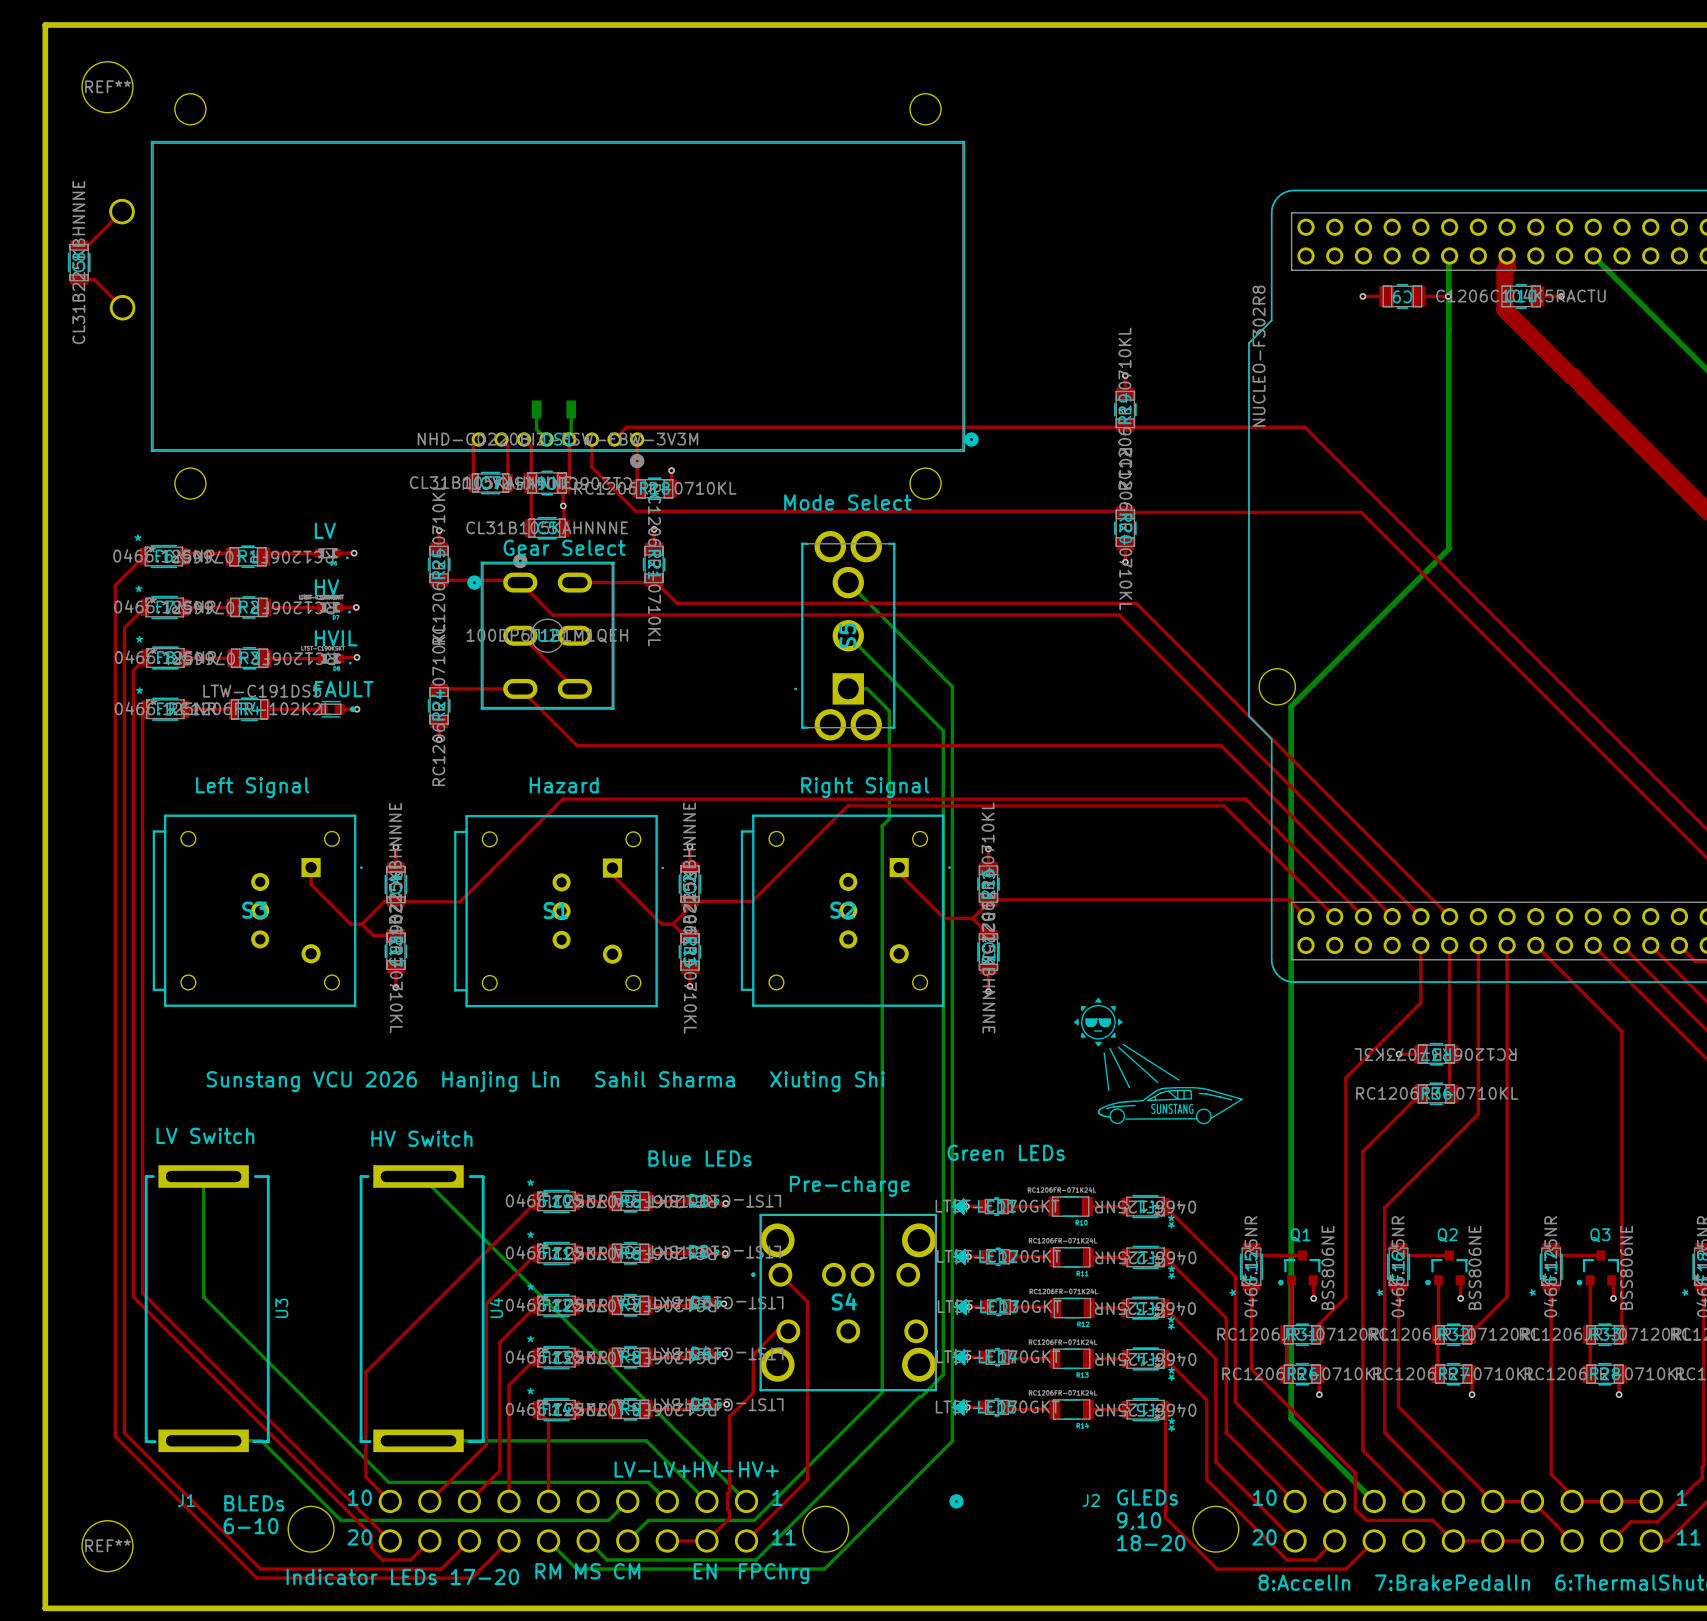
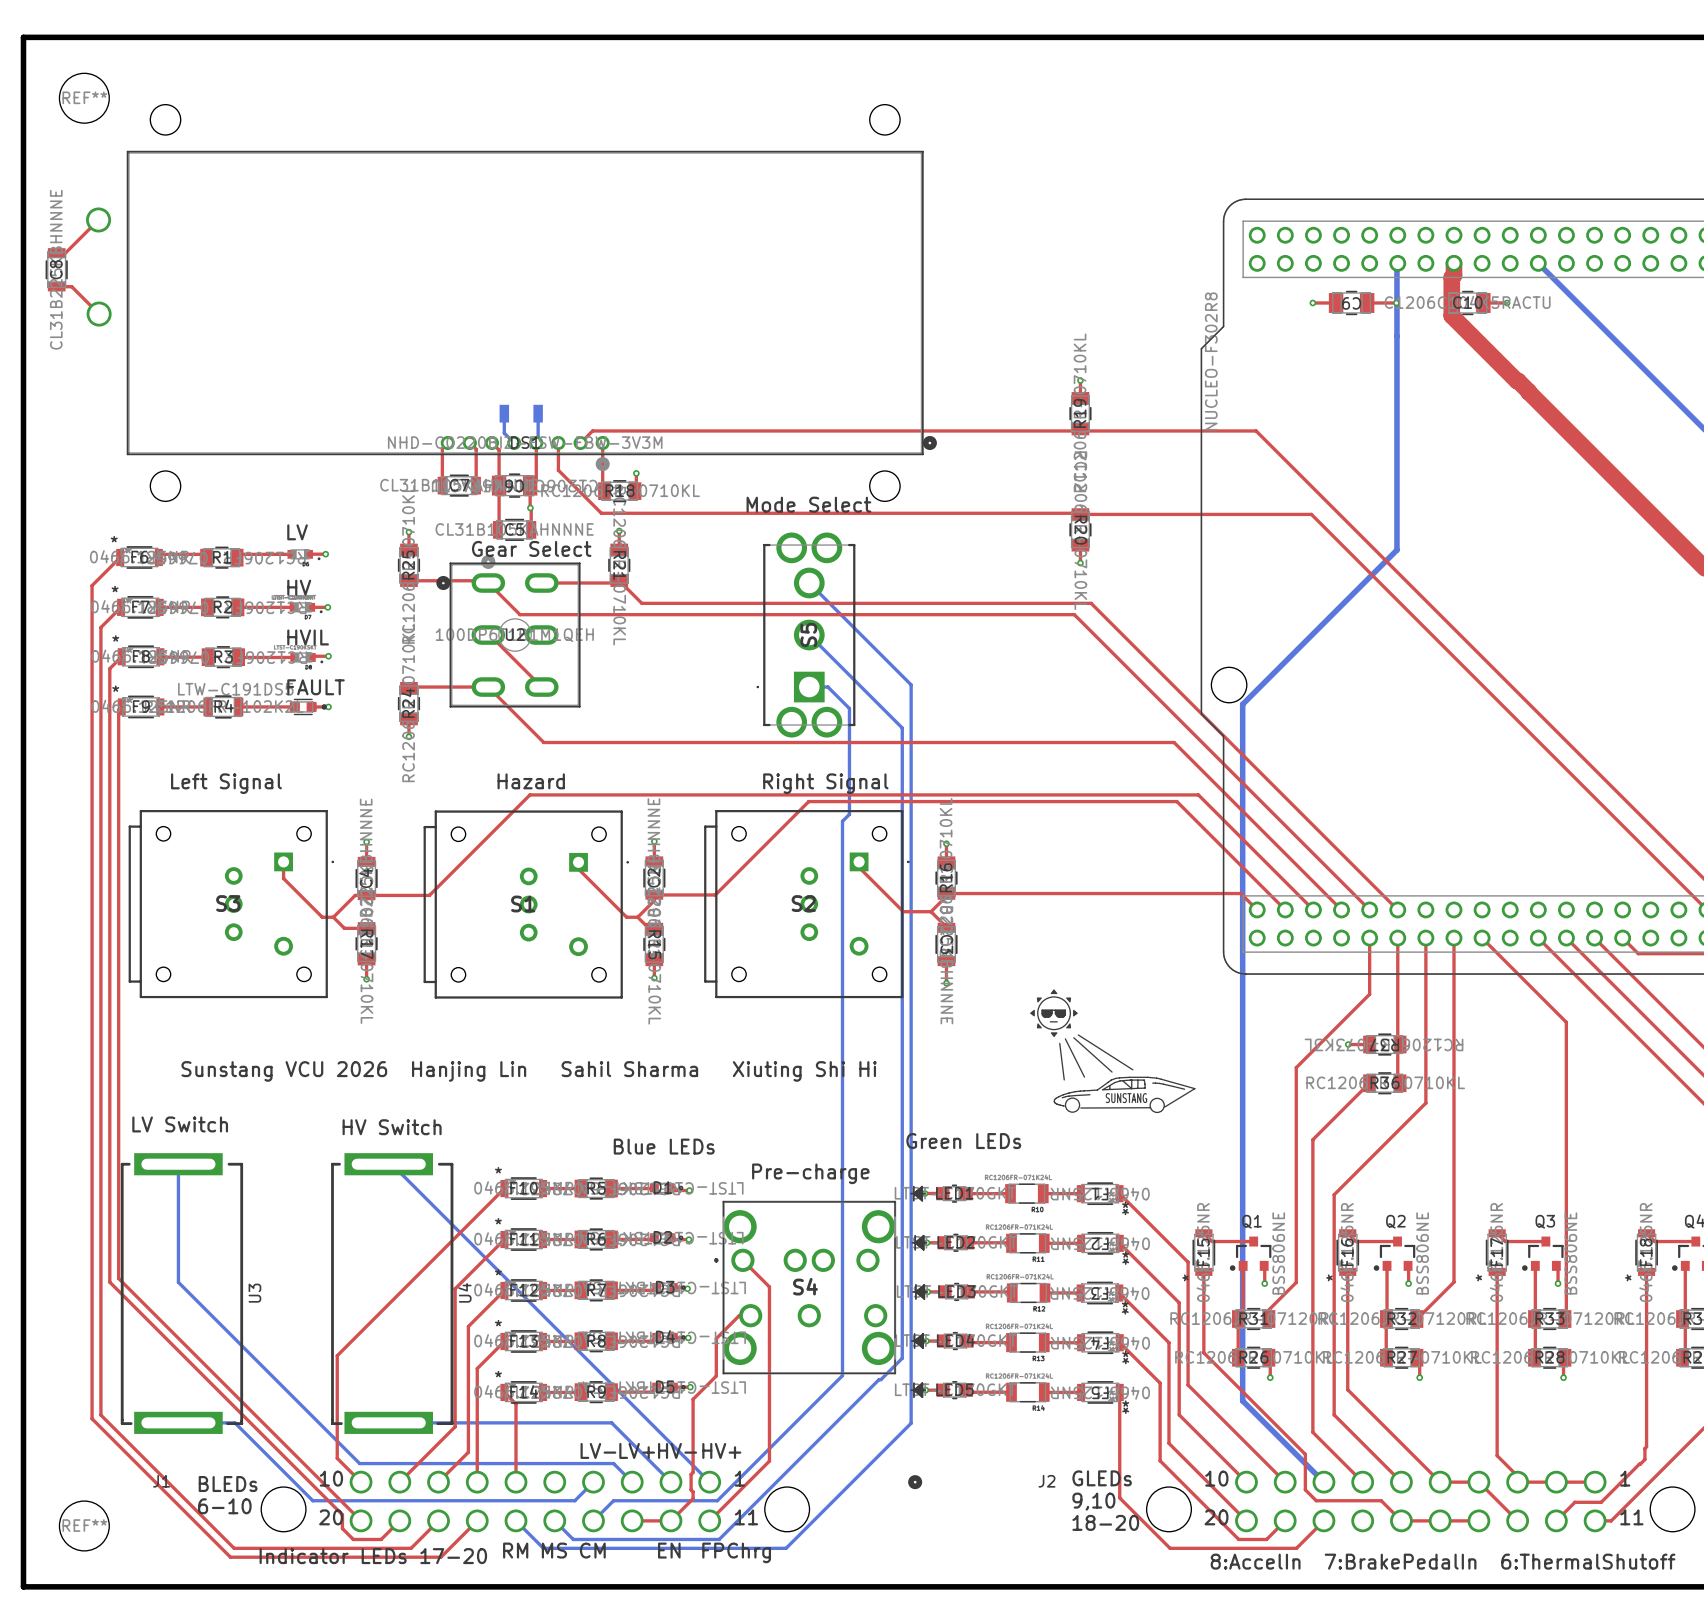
text: Sunstang VCU 2026 Hanjing Lin Sahil Sharma Xiuting Shi (545, 1081) -> Sunstang VCU 2026 Hanjing Lin Sahil Sharma Xiuting Shi Hi (529, 1071)

